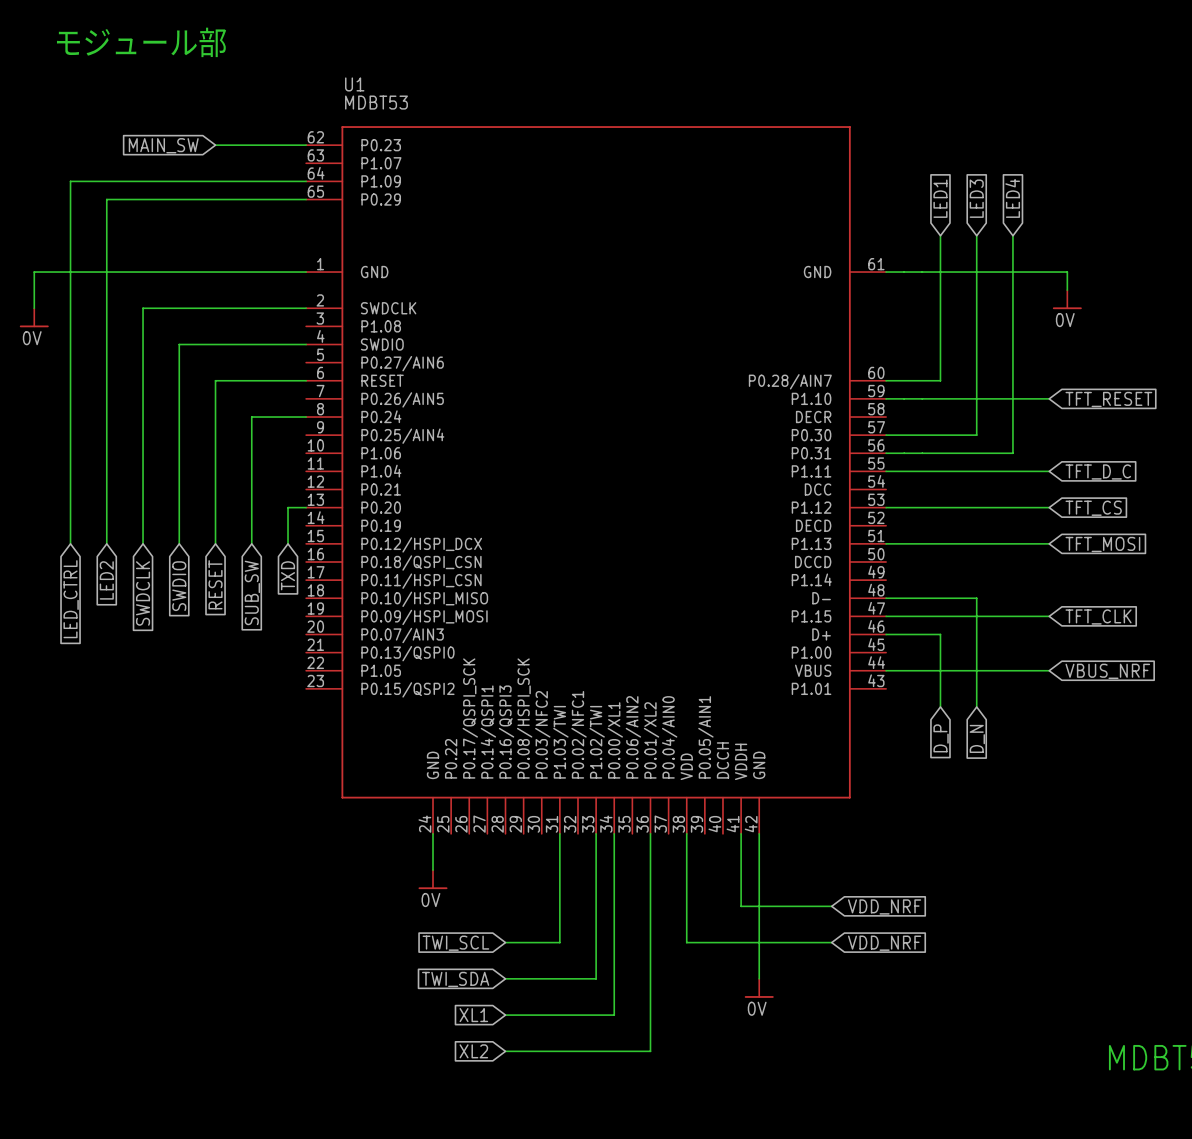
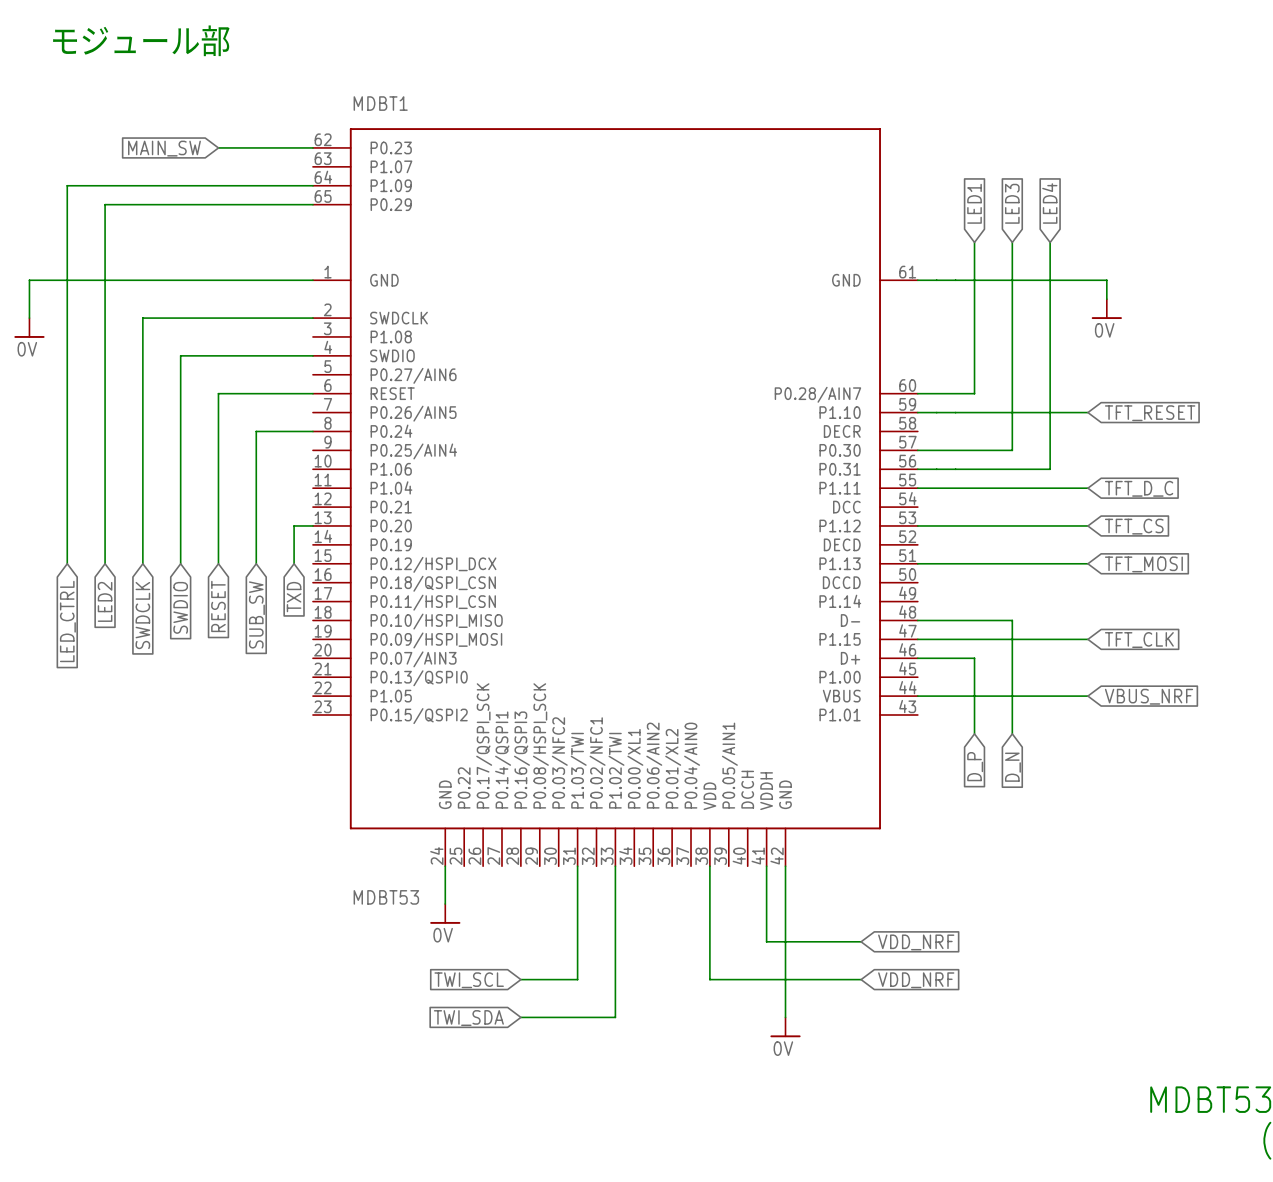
U1 name: U1 (354, 84) -> MDBT1 (380, 103)
U1 value position: MDBT53 (376, 102) -> MDBT53 (386, 897)
wire: (614, 833) (614, 1015) (505, 1015) -> none
wire: (650, 833) (650, 1051) (505, 1051) -> none
global label: XL1 (473, 1015) -> none
global label: XL2 (473, 1051) -> none

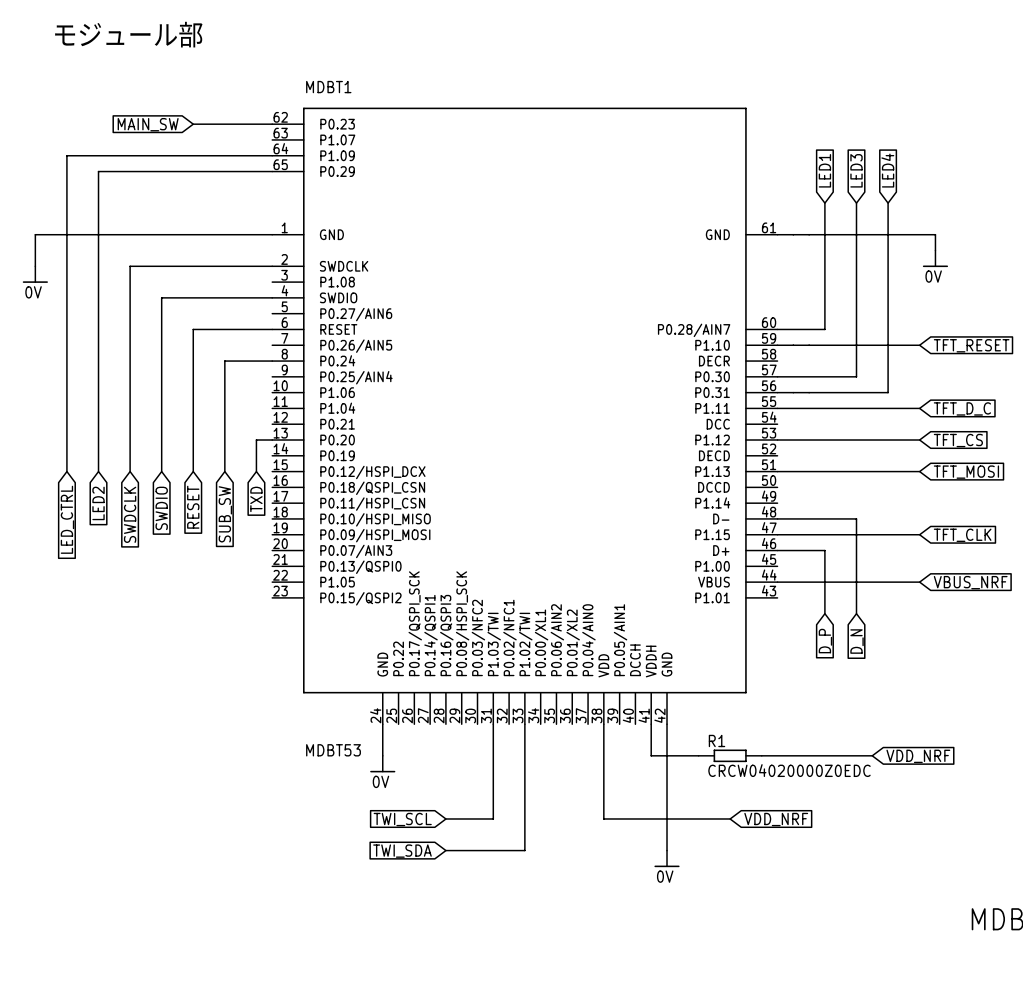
wire: (766, 904) (766, 941) (861, 941) -> (651, 755) (698, 755)
R1: none -> CRCW04020000Z0EDC (730, 755)
wire: none -> (761, 755) (872, 755)
global label position: VDD_NRF (916, 942) -> VDD_NRF (918, 756)

